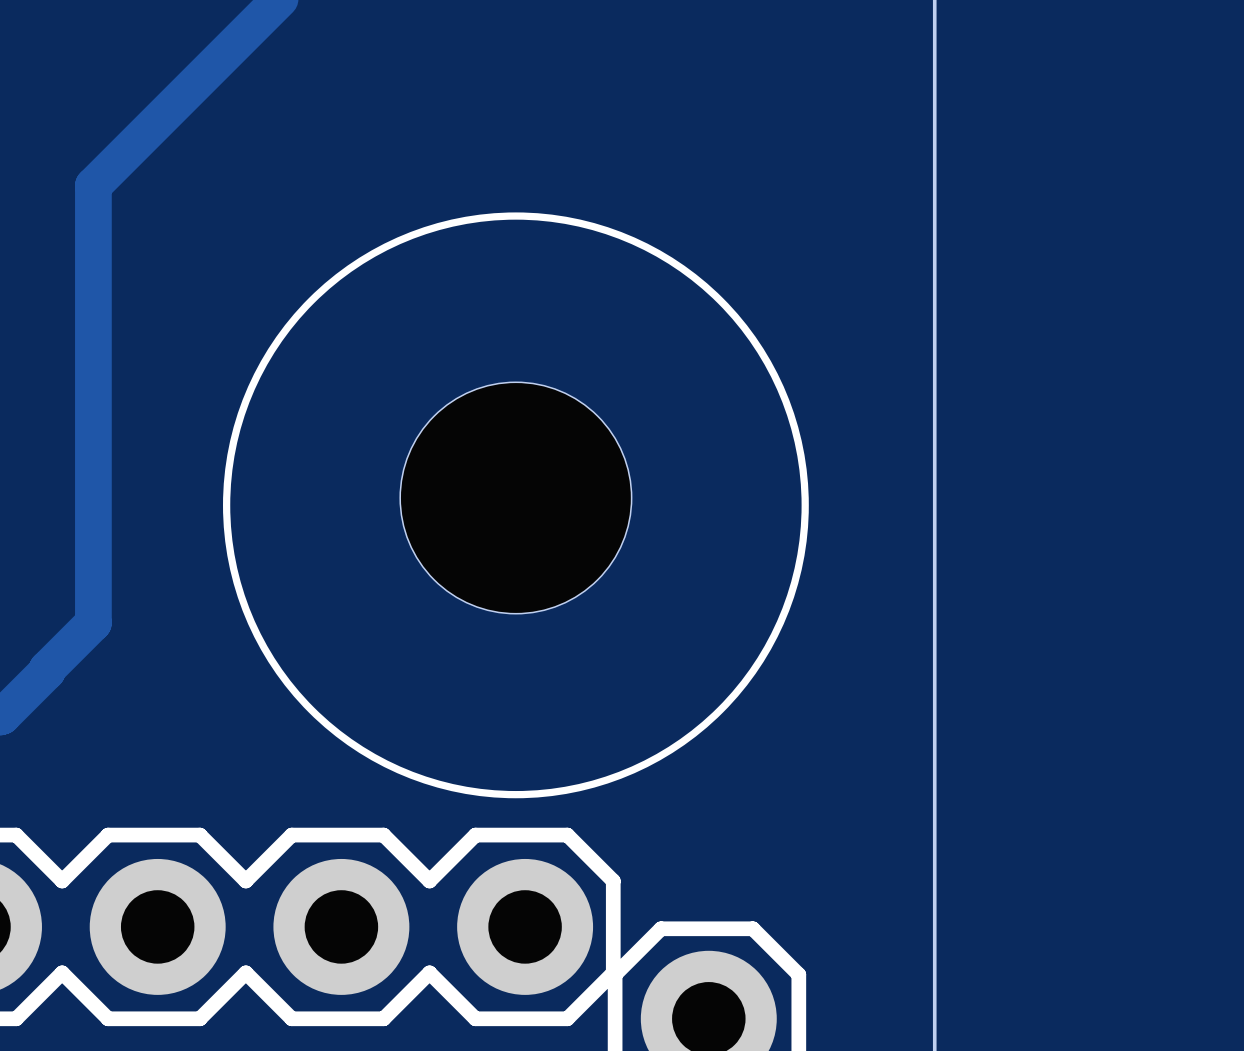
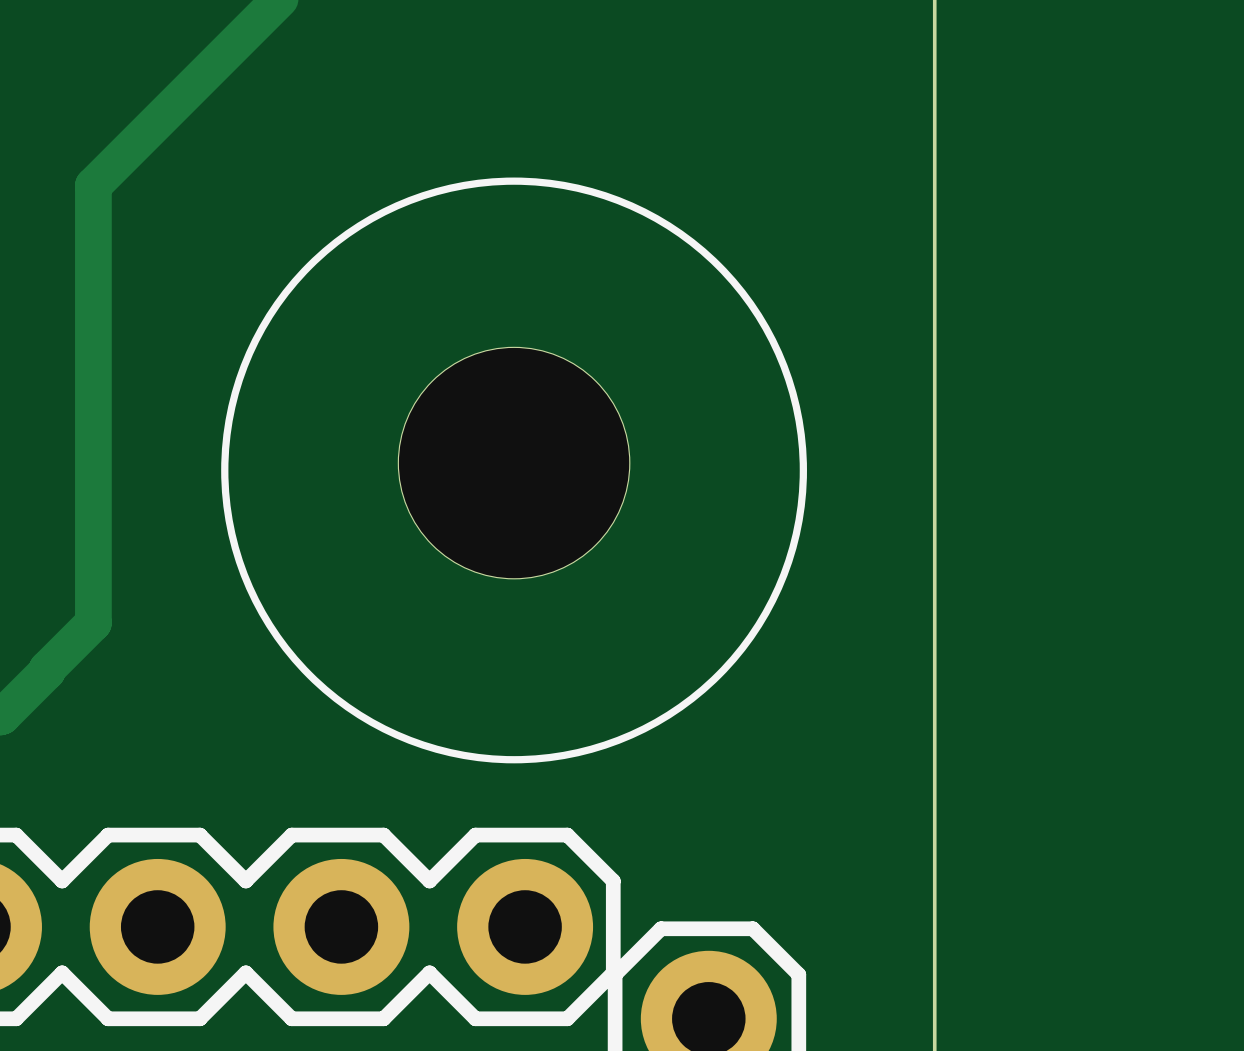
part position: (515, 497) -> (514, 463)
drawing position: (515, 505) -> (514, 470)

